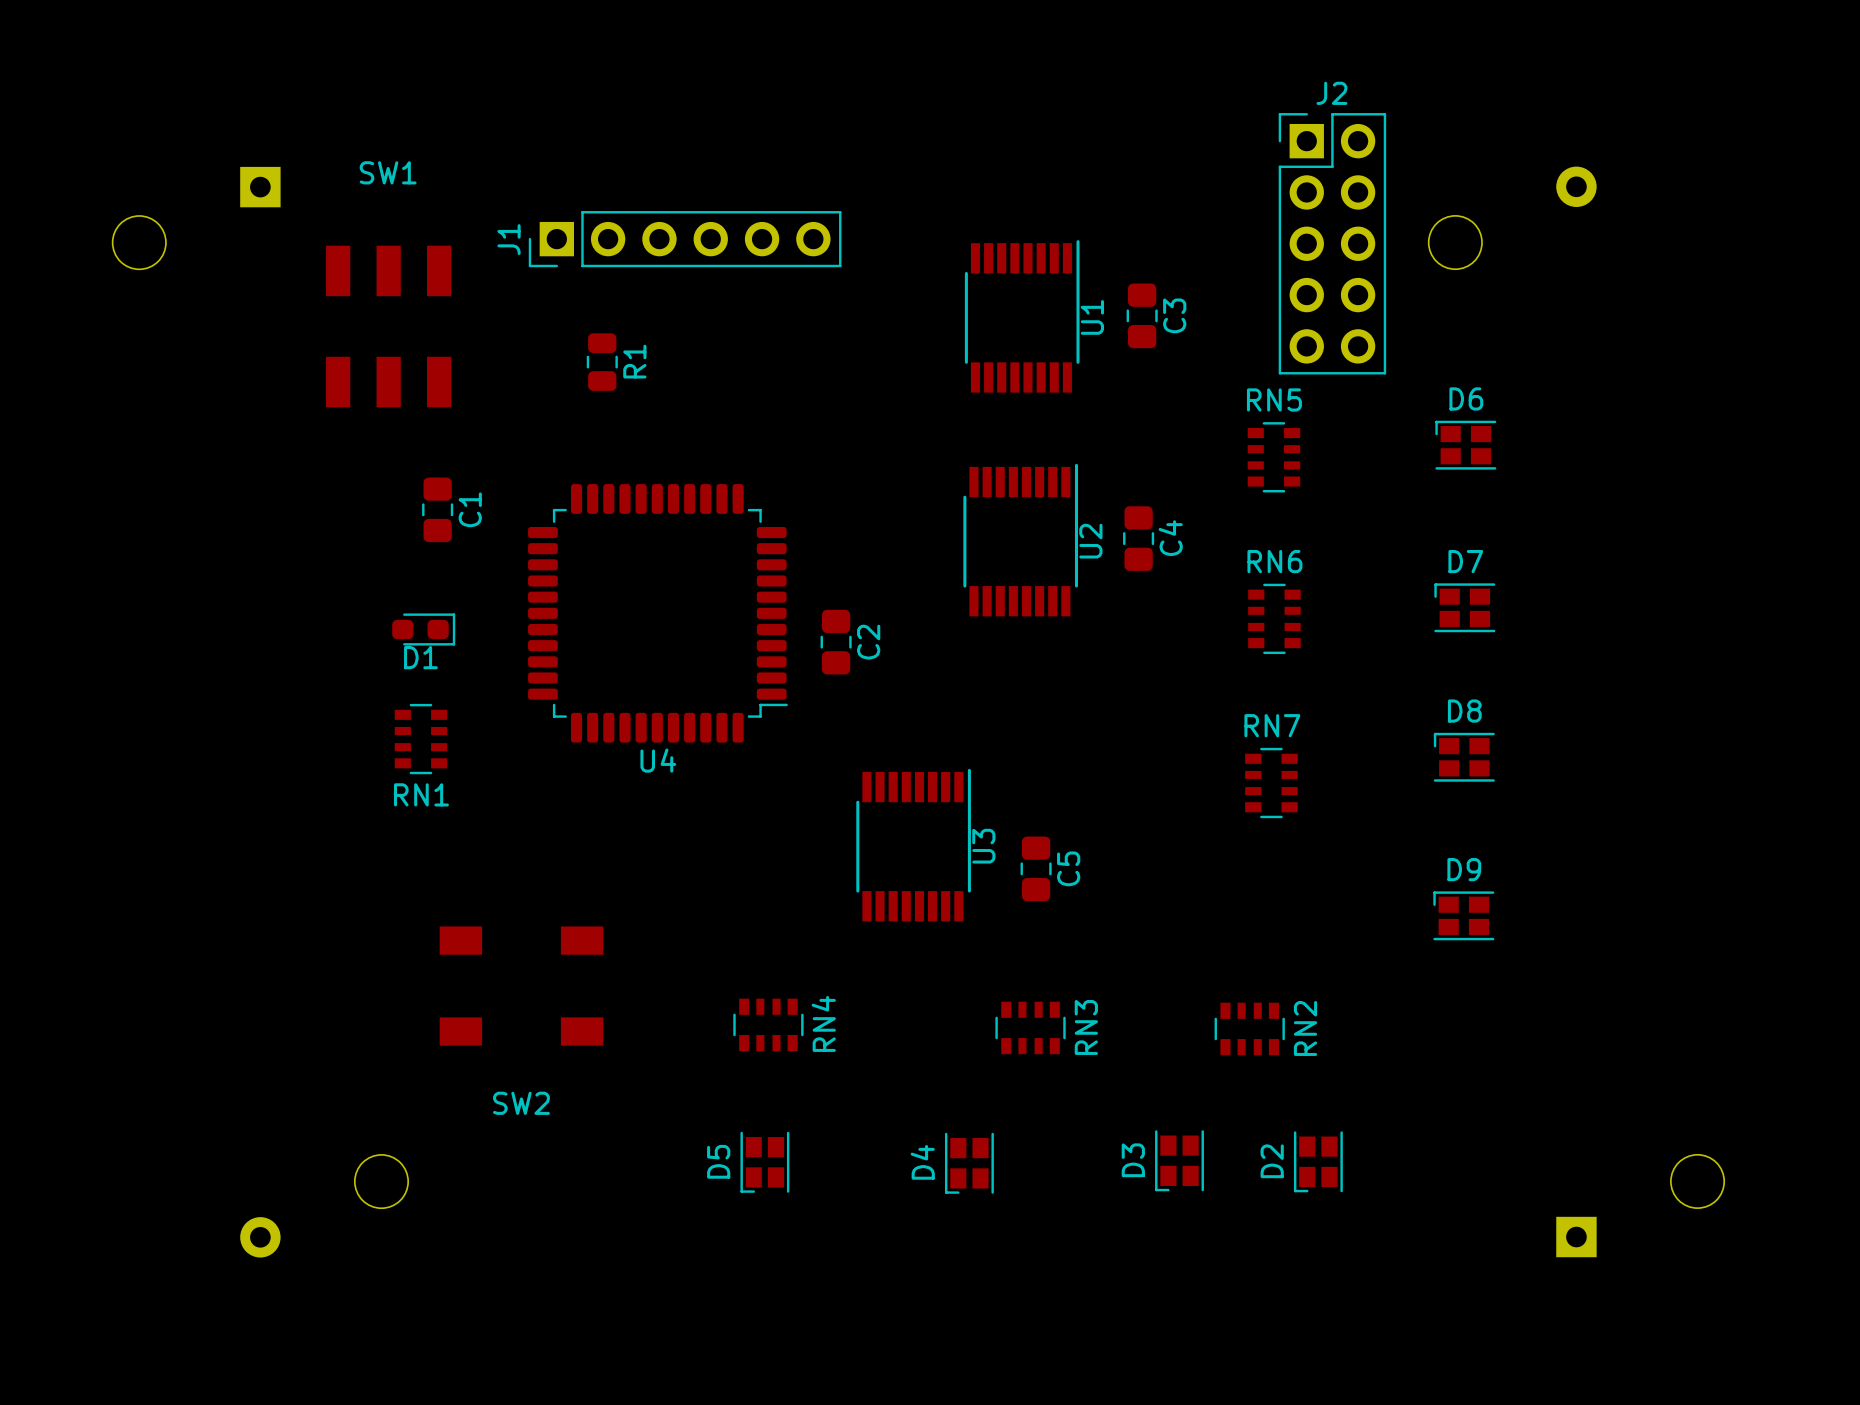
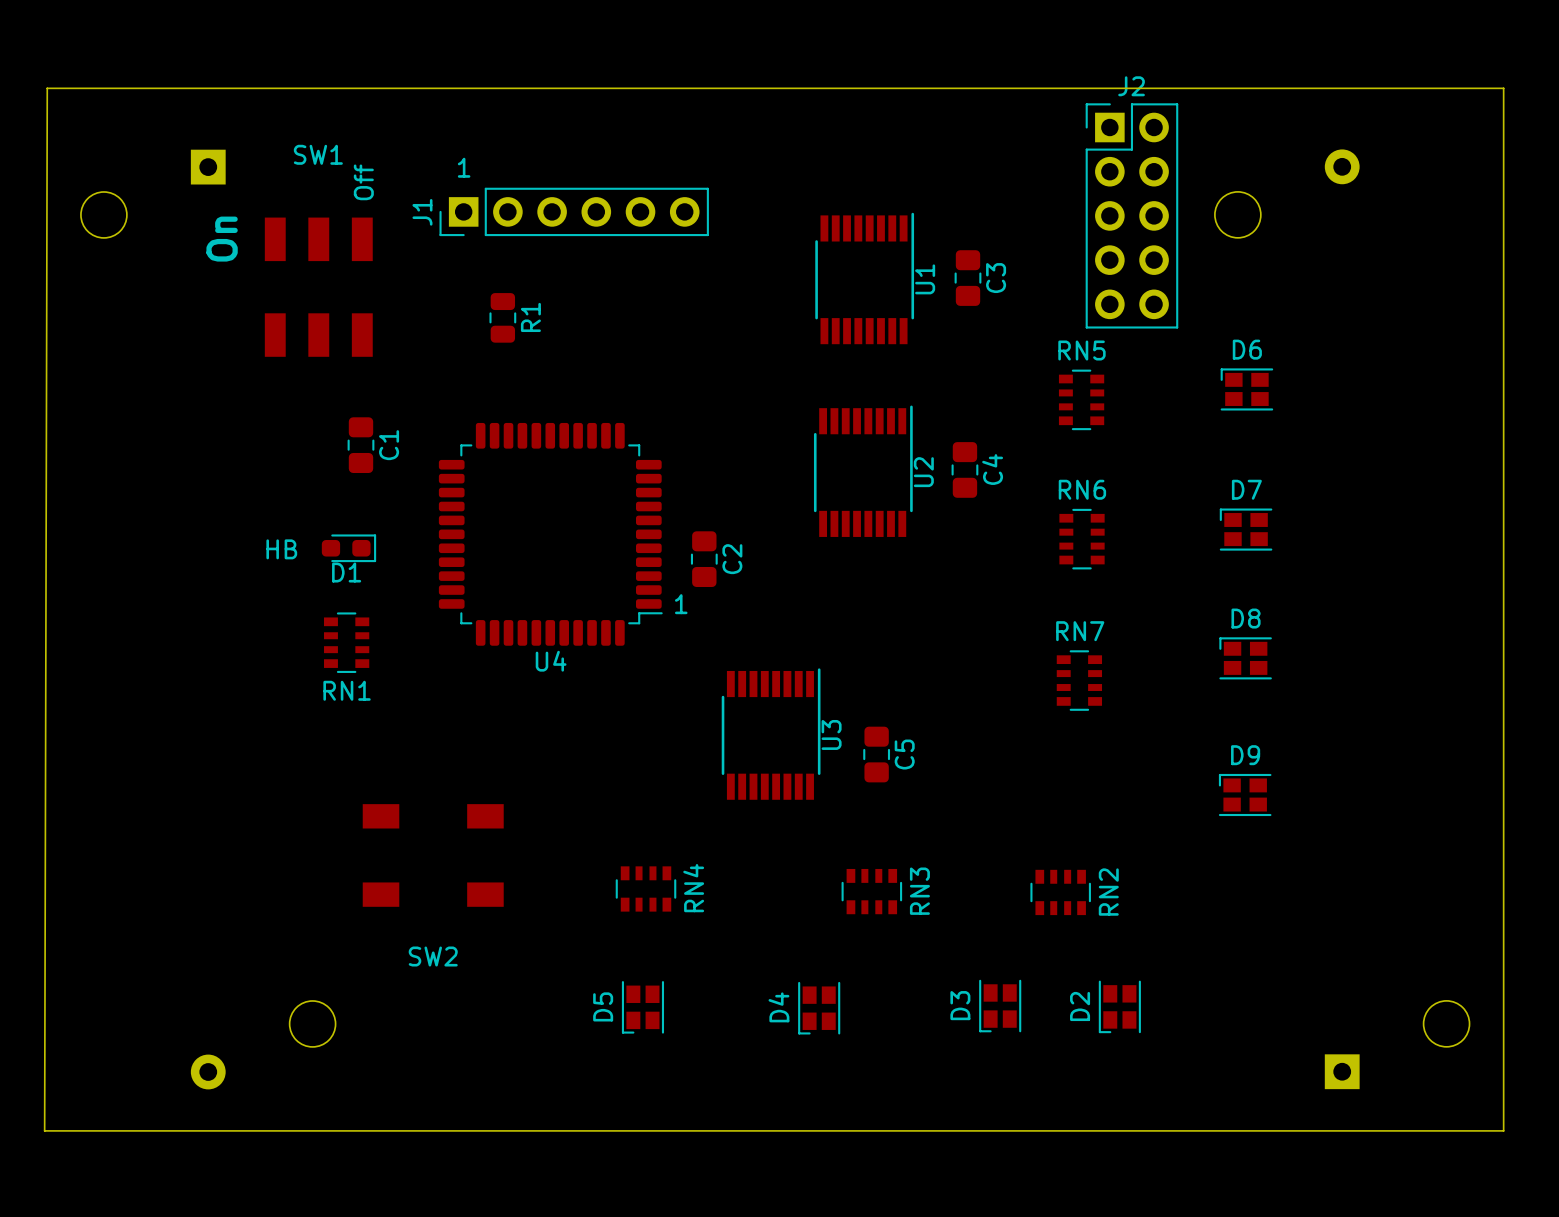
board edge: none -> (47, 88) (44, 1130) (1503, 1130) (1503, 88) (47, 88)
text: none -> 1 (464, 167)
text: none -> Off (363, 182)
text: none -> On (222, 239)
text: none -> HB (281, 549)
text: none -> 1 (681, 604)

